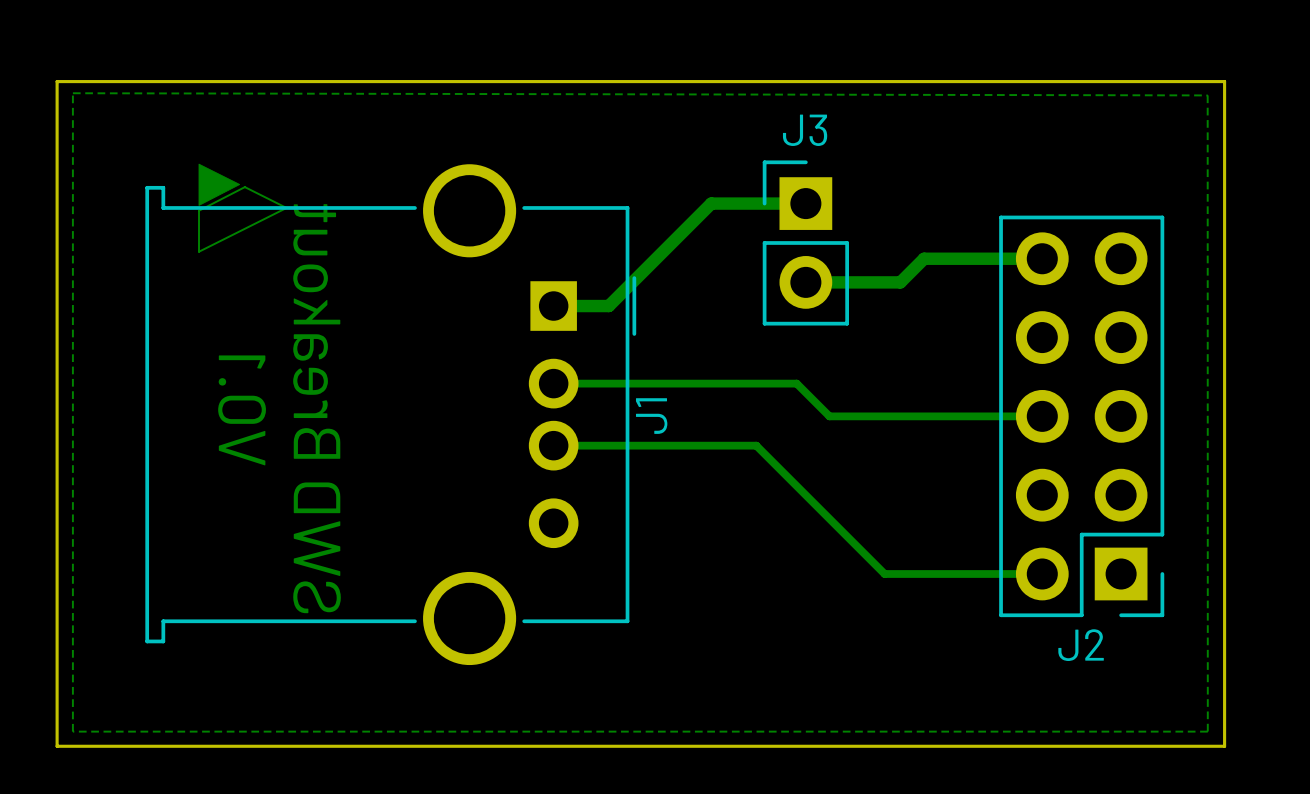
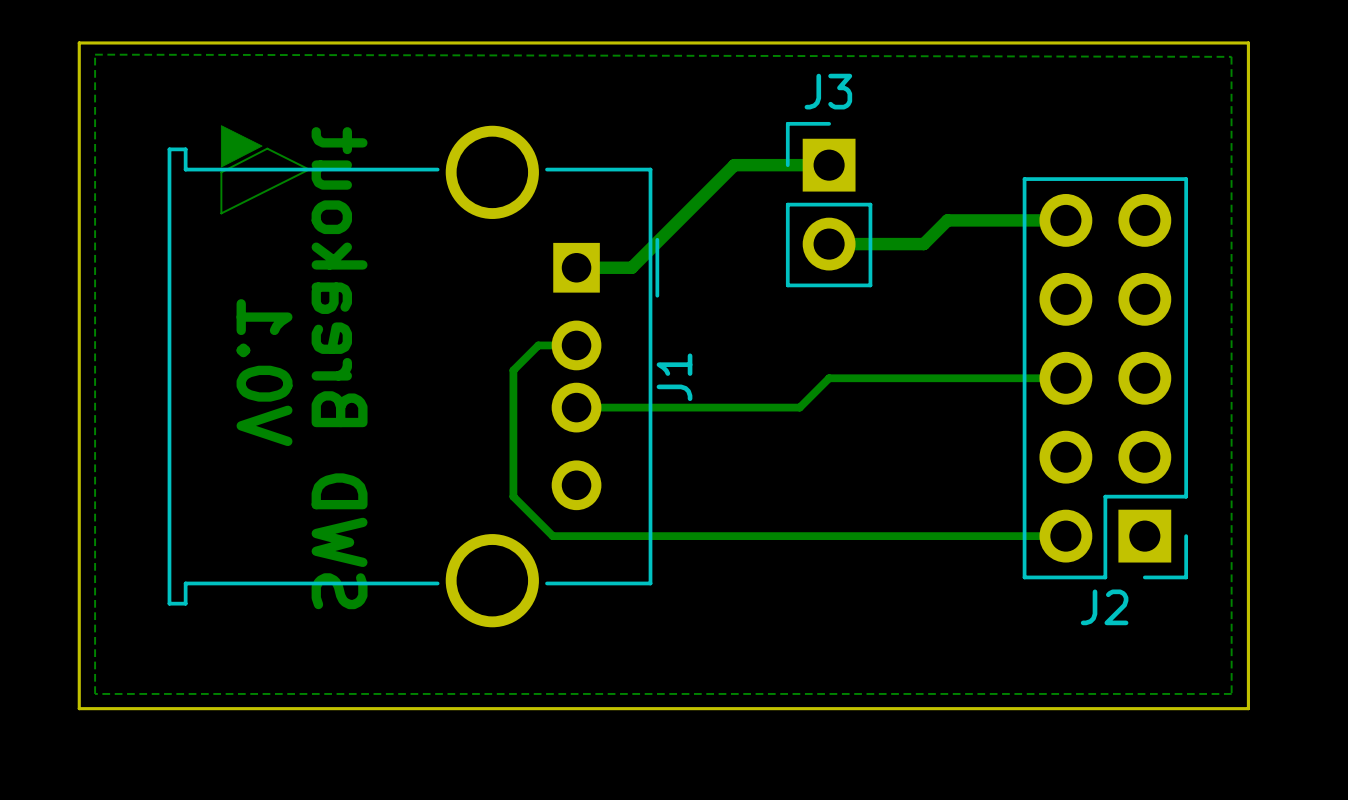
bottom track: (553, 383) (796, 383) (829, 416) -> (576, 345) (538, 345) (513, 370) (513, 496) (552, 536) (908, 536)
bottom track: (756, 445) (884, 573) -> (779, 407) (799, 407) (829, 378) (852, 378)

